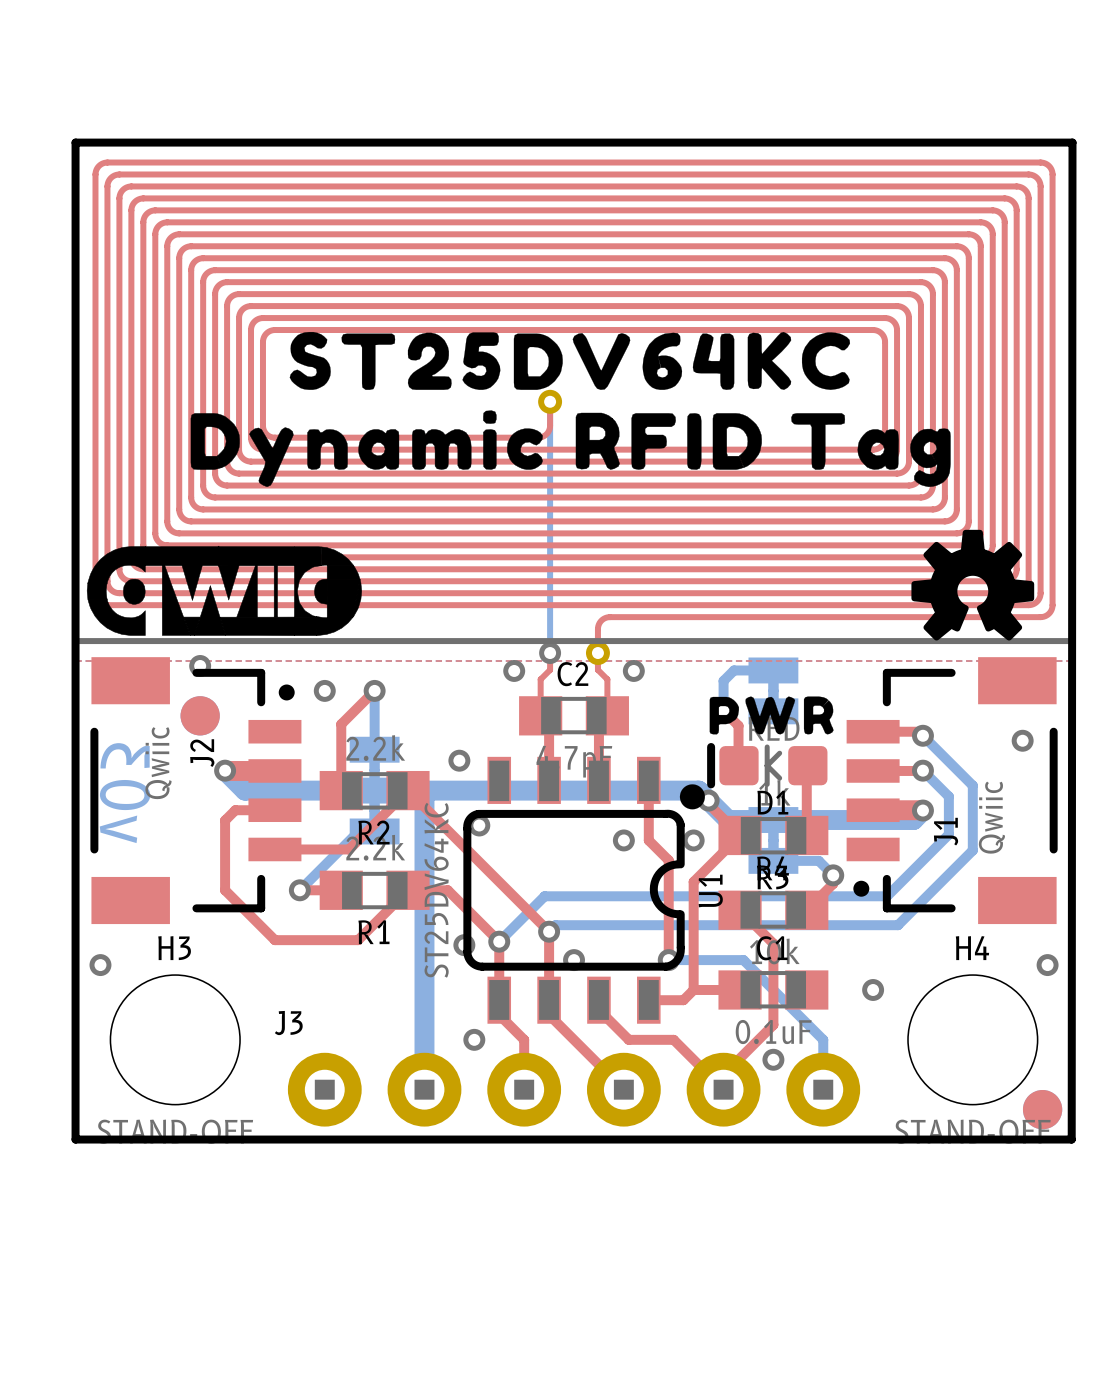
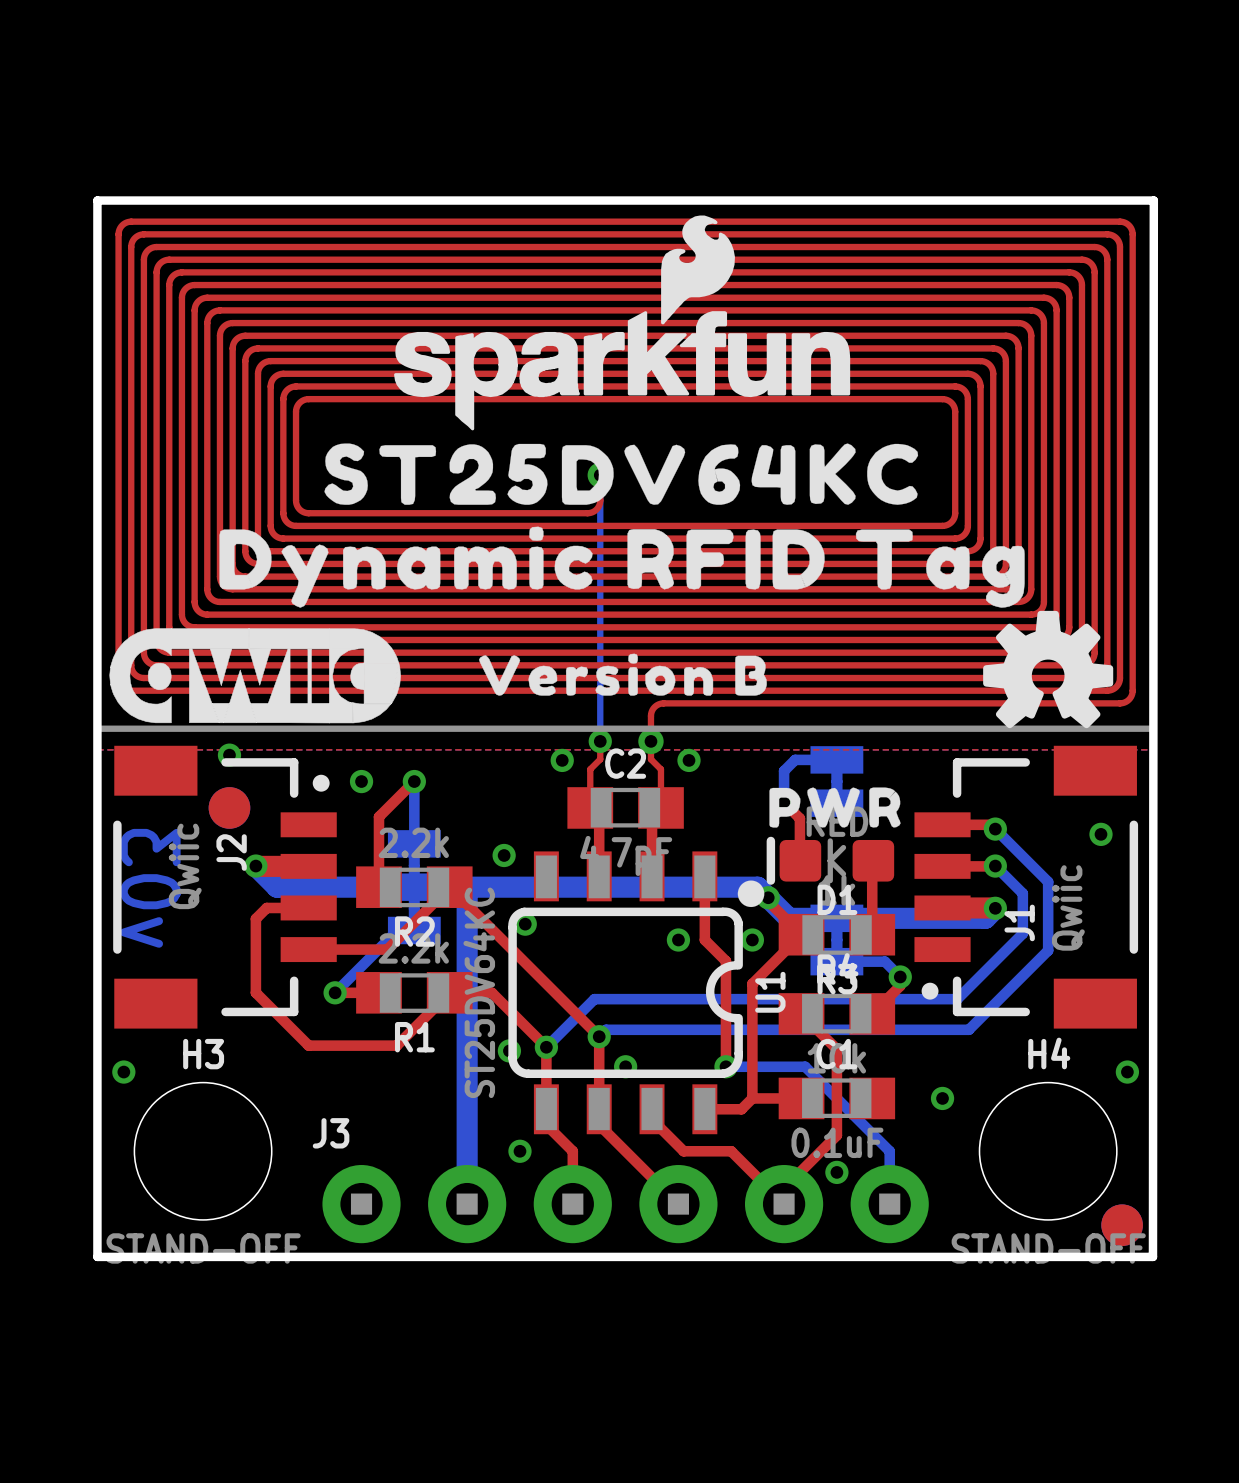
drawing: none -> [394, 215, 851, 431]
drawing position: (569, 360) -> (621, 474)
drawing position: (570, 448) -> (622, 567)
drawing: none -> [479, 653, 767, 696]

